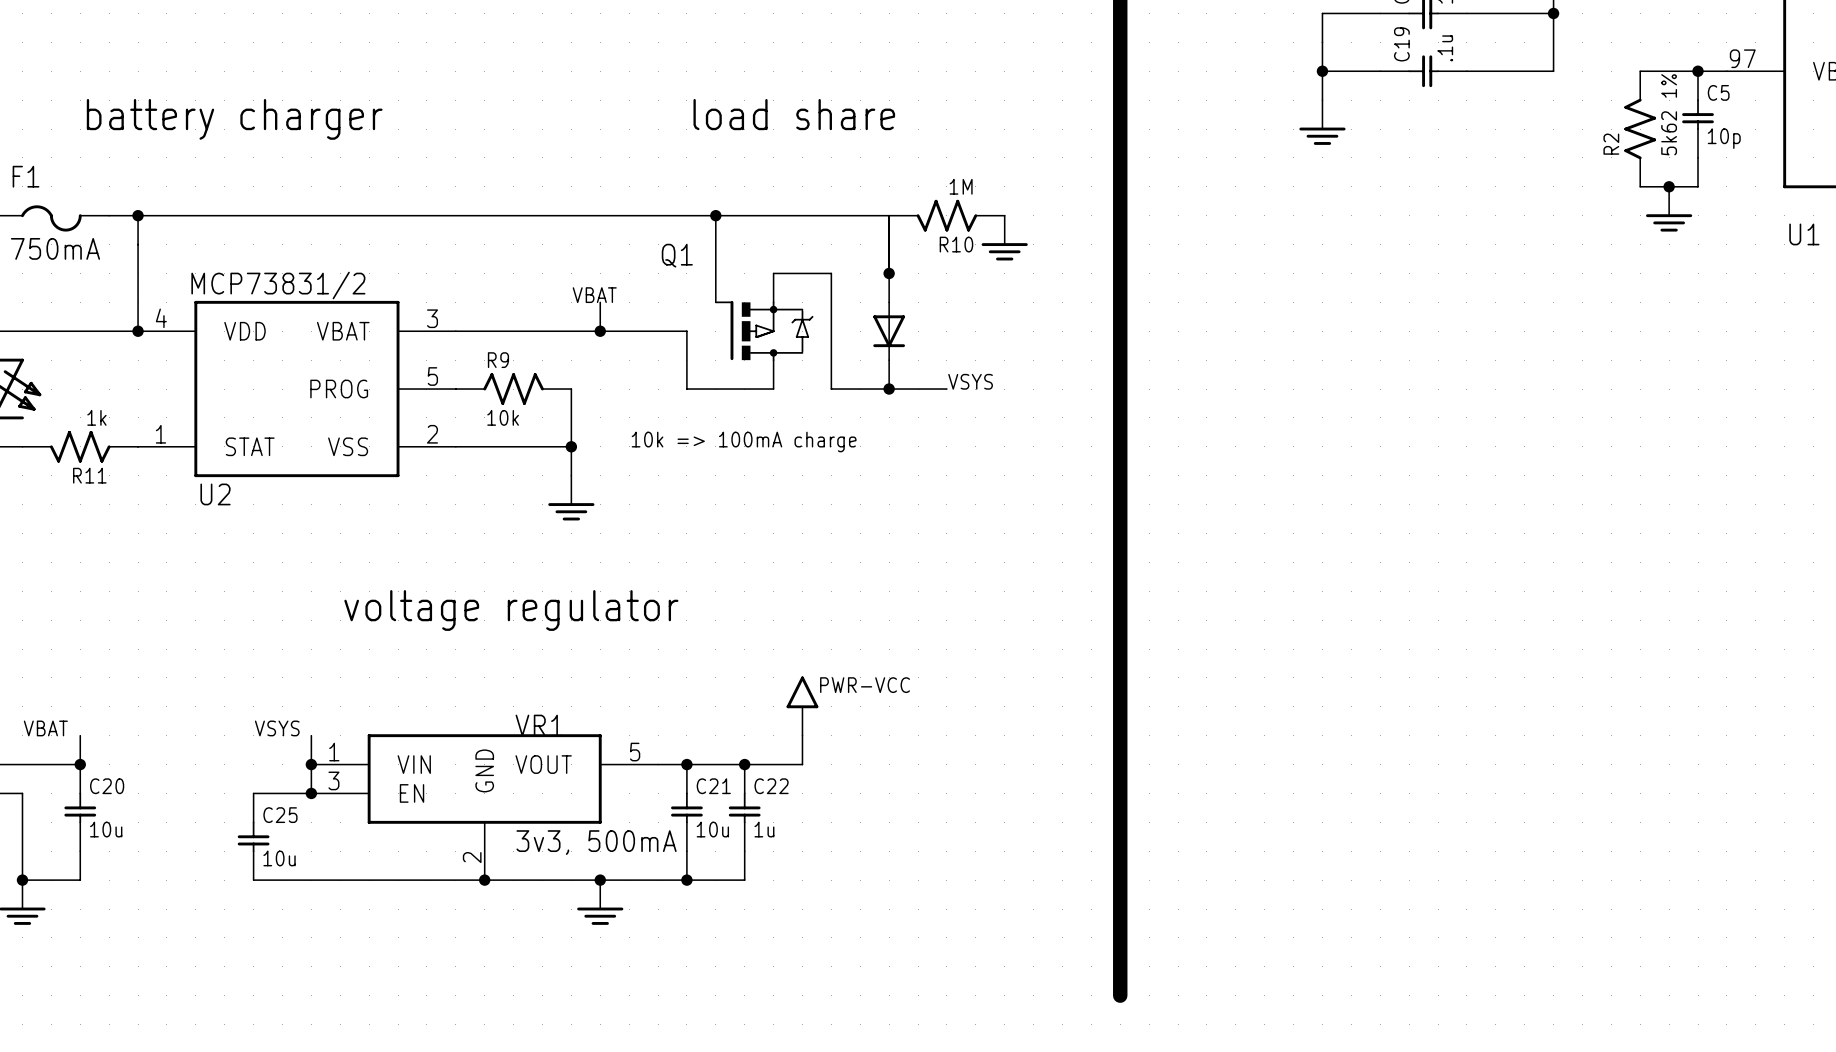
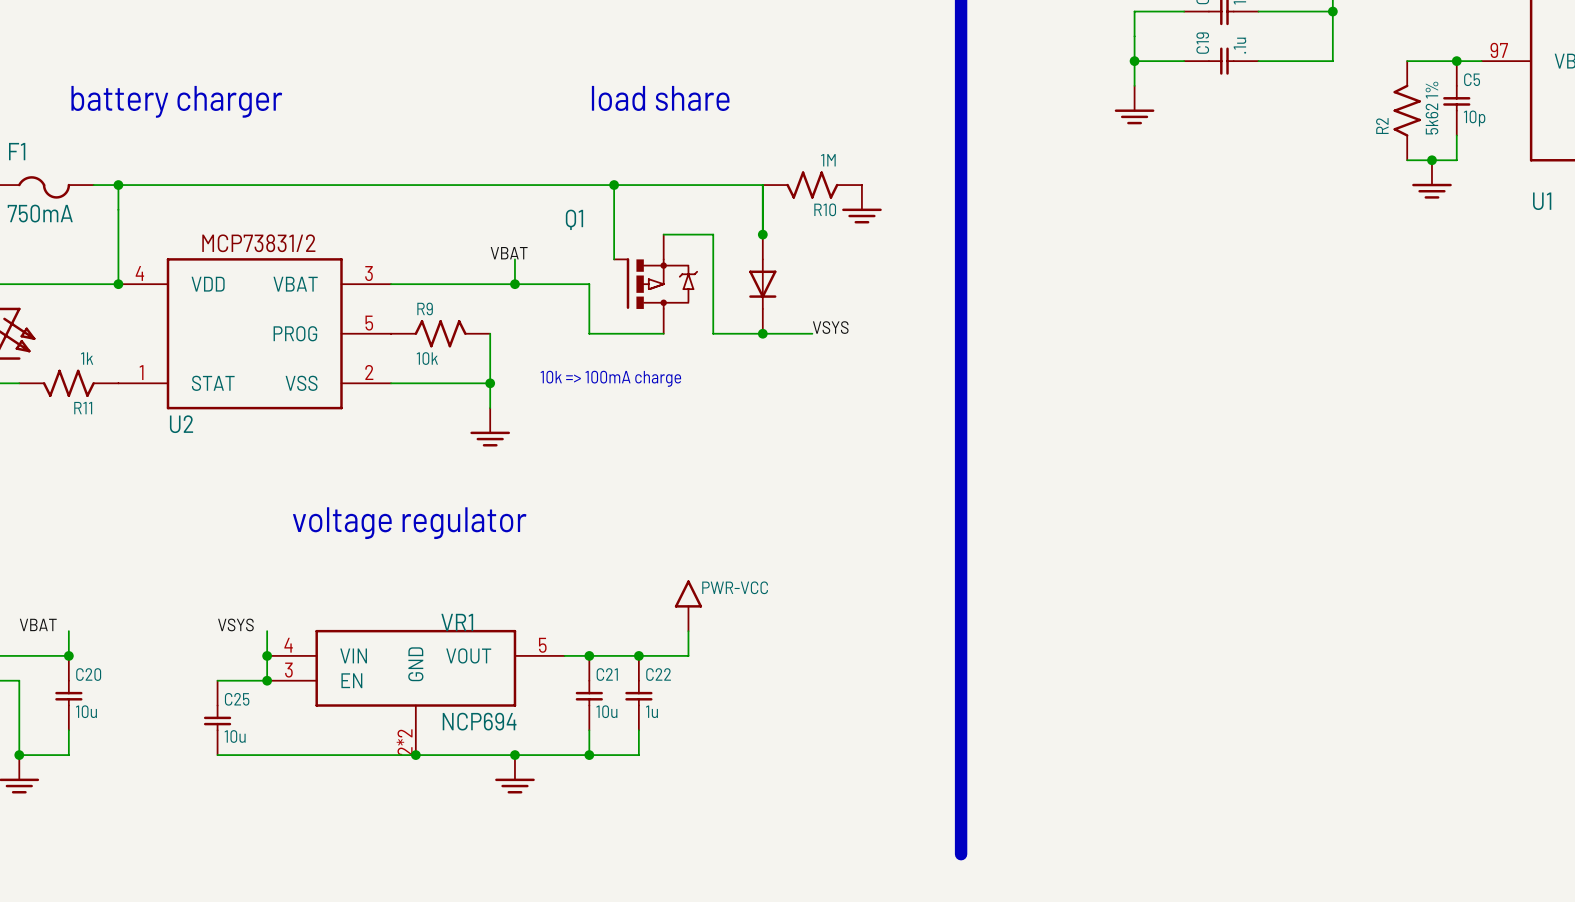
VR1 pin number: 1 (334, 752) -> 4 (288, 645)
VR1 value: 3v3, 500mA (596, 842) -> NCP694 (479, 721)
VR1 pin number: 2 (472, 857) -> 2*2 (404, 742)

